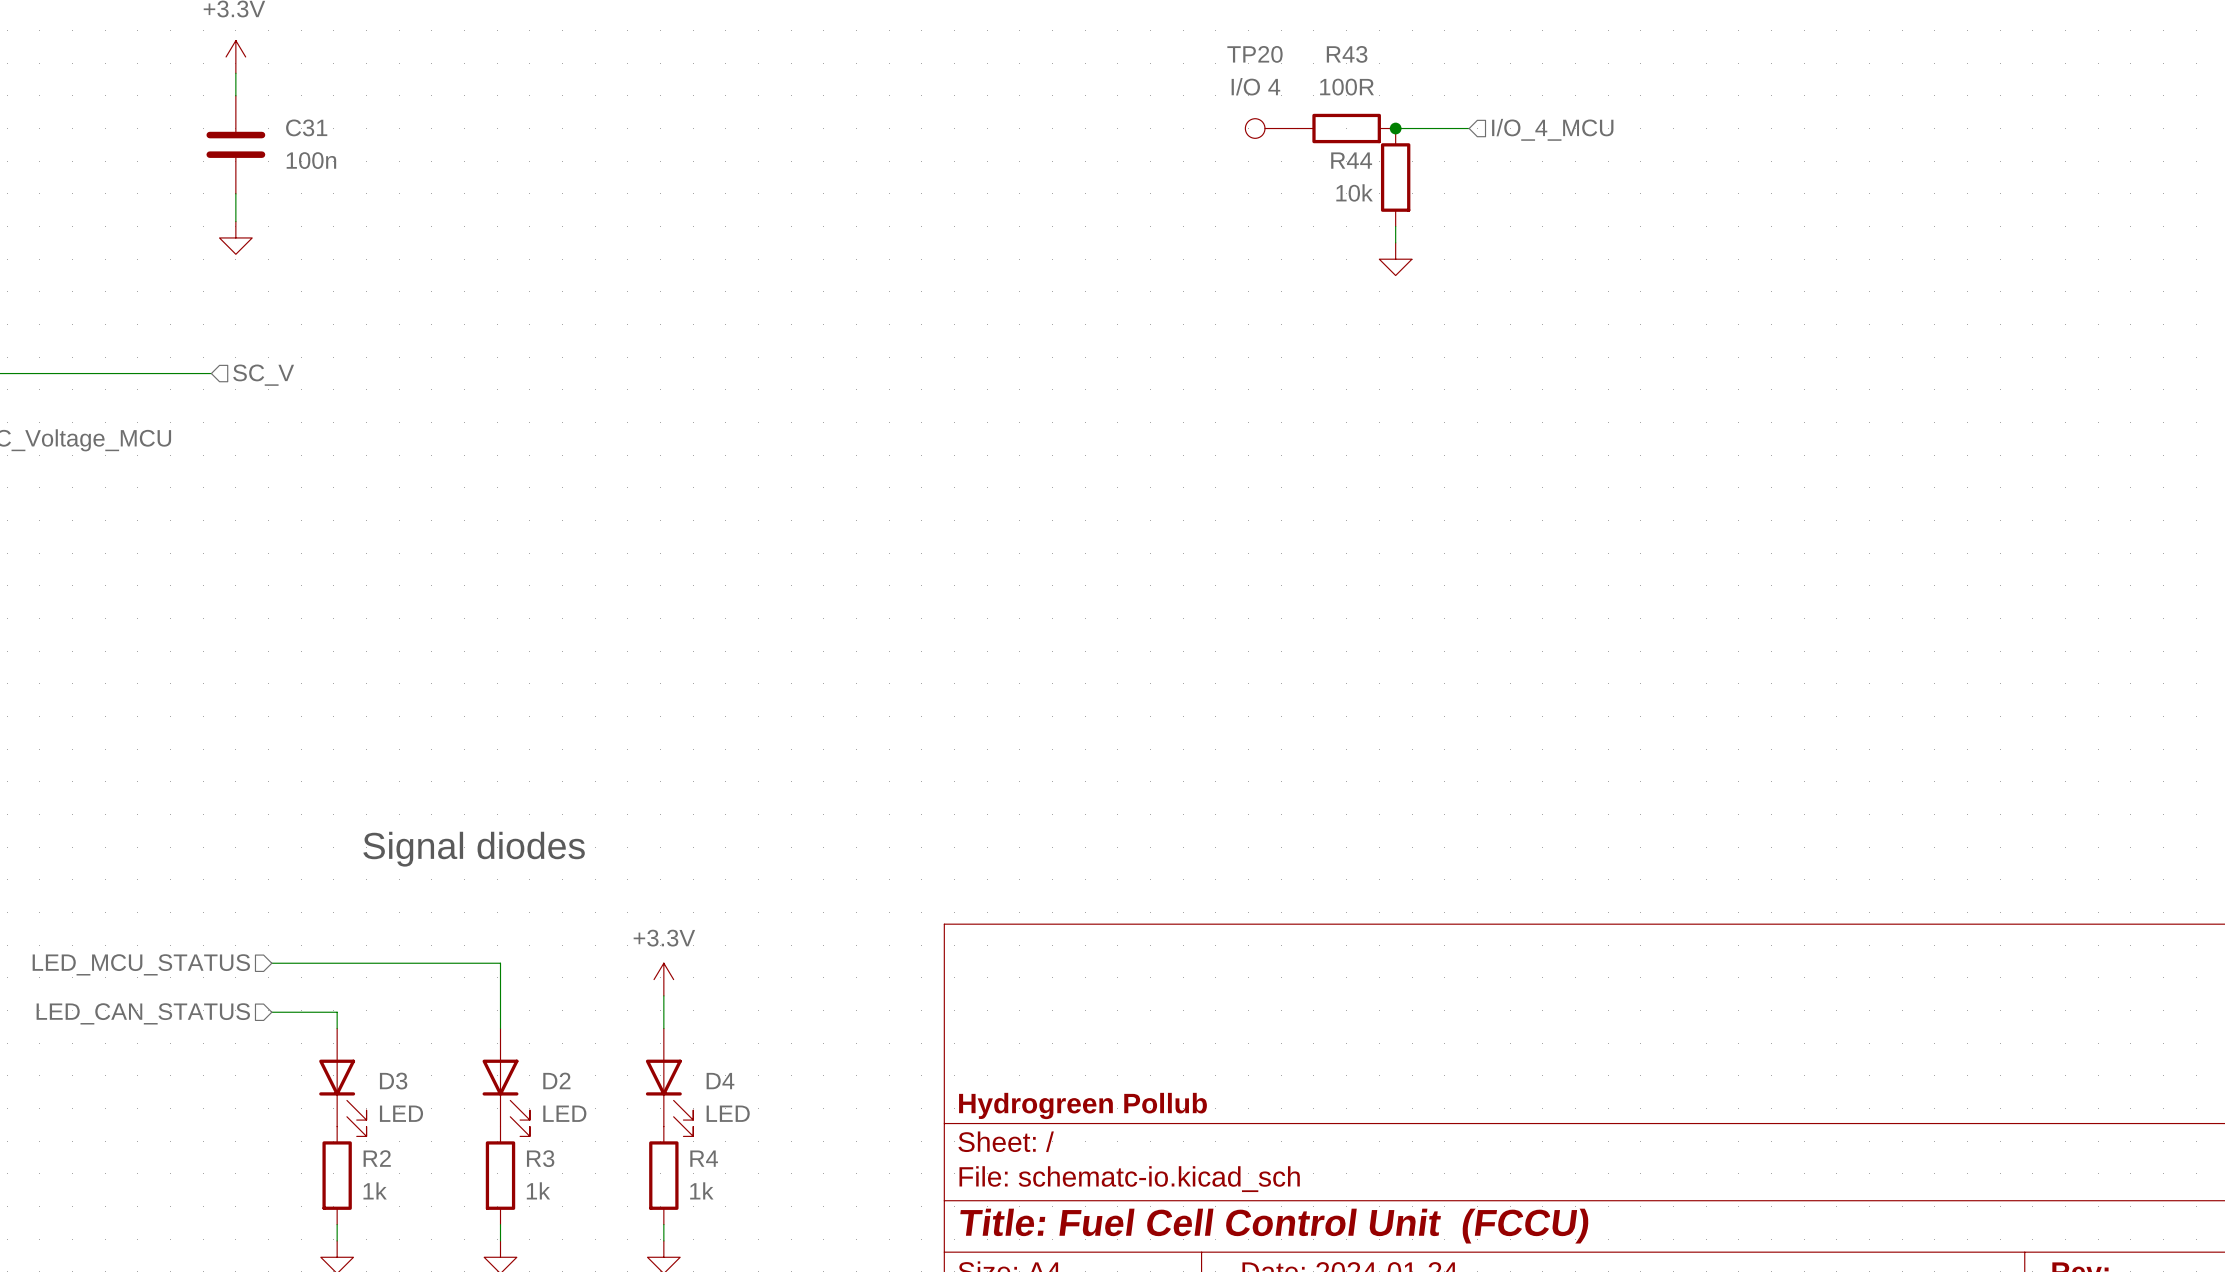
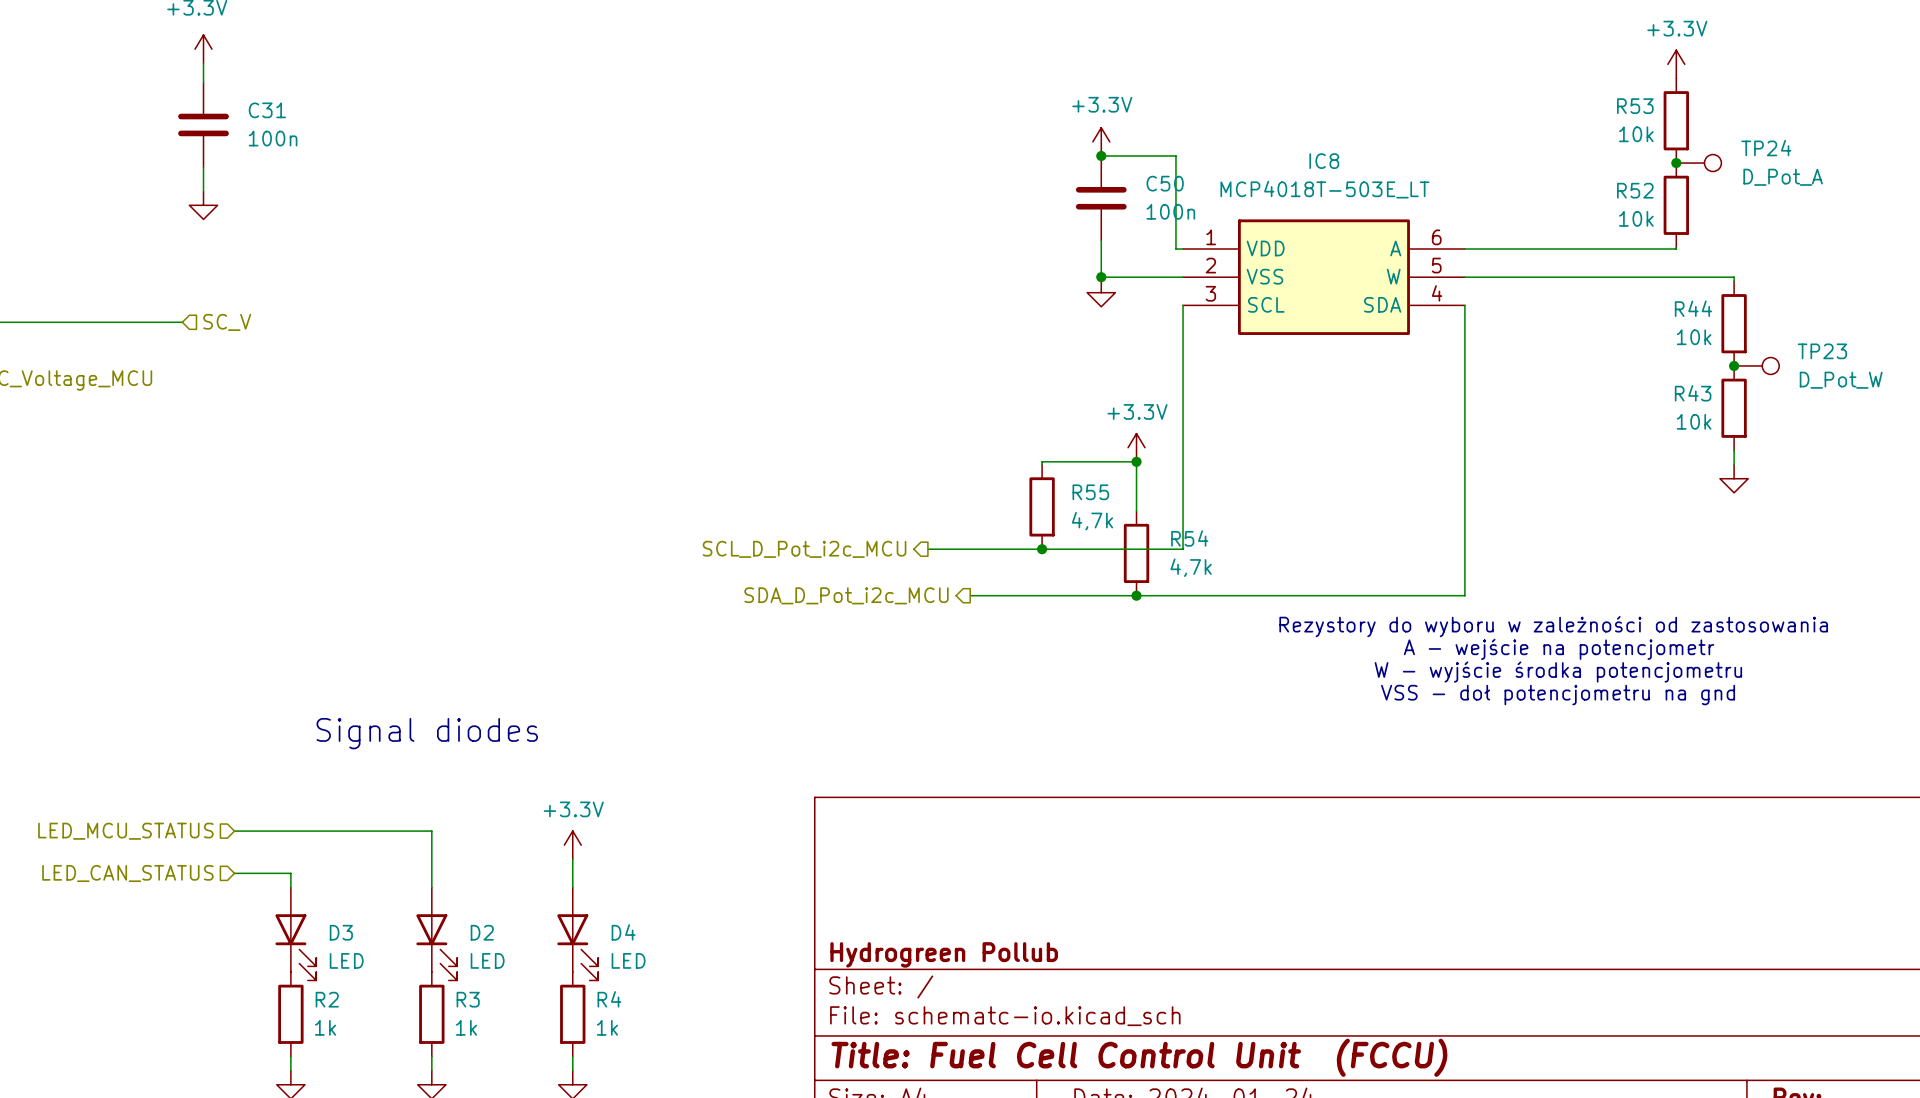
R43 name position: R43 (1347, 54) -> R43 (1693, 393)
power symbol: none -> +3.3V (1676, 64)
R43 value: 100R (1347, 87) -> 10k (1694, 421)
TP20: I/O 4 (1271, 128) -> none
R43 rotation: 0° (1346, 128) -> 90° clockwise (1734, 408)
R43 position: (1346, 128) -> (1734, 408)
wire: (1395, 128) (1469, 128) -> none
junction: (1395, 128) -> none
hierarchical label: I/O_4_MCU (1552, 129) -> none
R53: none -> 10k (1676, 120)
power symbol: none -> +3.3V (1101, 141)
R44 position: (1395, 177) -> (1734, 323)
wire: none -> (1101, 155) (1175, 155) (1175, 249) (1183, 249)
junction: none -> (1101, 155)
junction: none -> (1676, 163)
TP24: none -> D_Pot_A (1698, 163)
wire: (1395, 226) (1395, 242) -> none
C50: none -> 100n (1101, 198)
R52: none -> 10k (1676, 205)
power symbol position: (1395, 259) -> (1101, 292)
wire: none -> (1101, 240) (1101, 278)
wire: none -> (1676, 247) (1464, 249)
wire: none -> (1101, 277) (1183, 277)
junction: none -> (1101, 277)
IC8: none -> MCP4018T-503E_LT (1323, 277)
wire: none -> (1464, 277) (1734, 277) (1734, 281)
wire: none -> (1183, 305) (1183, 549) (927, 549)
wire: none -> (1464, 305) (1464, 595) (970, 595)
junction: none -> (1734, 365)
TP23: none -> D_Pot_W (1756, 365)
power symbol: none -> +3.3V (1136, 447)
wire: none -> (1734, 450) (1734, 464)
junction: none -> (1136, 461)
wire: none -> (1042, 464) (1042, 461) (1136, 461) (1136, 511)
power symbol: none -> (1734, 478)
R55: none -> 4,7k (1042, 506)
junction: none -> (1042, 549)
hierarchical label: none -> SCL_D_Pot_i2c_MCU (804, 549)
R54: none -> 4,7k (1136, 553)
junction: none -> (1136, 595)
hierarchical label: none -> SDA_D_Pot_i2c_MCU (846, 595)
text: none -> Rezystory do wyboru w zależności od zastosowania (1553, 626)
text: none -> A - wejście na potencjometr (1559, 649)
text: none -> W - wyjście środka potencjometru (1558, 672)
text: none -> VSS - doł potencjometru na gnd (1558, 695)

